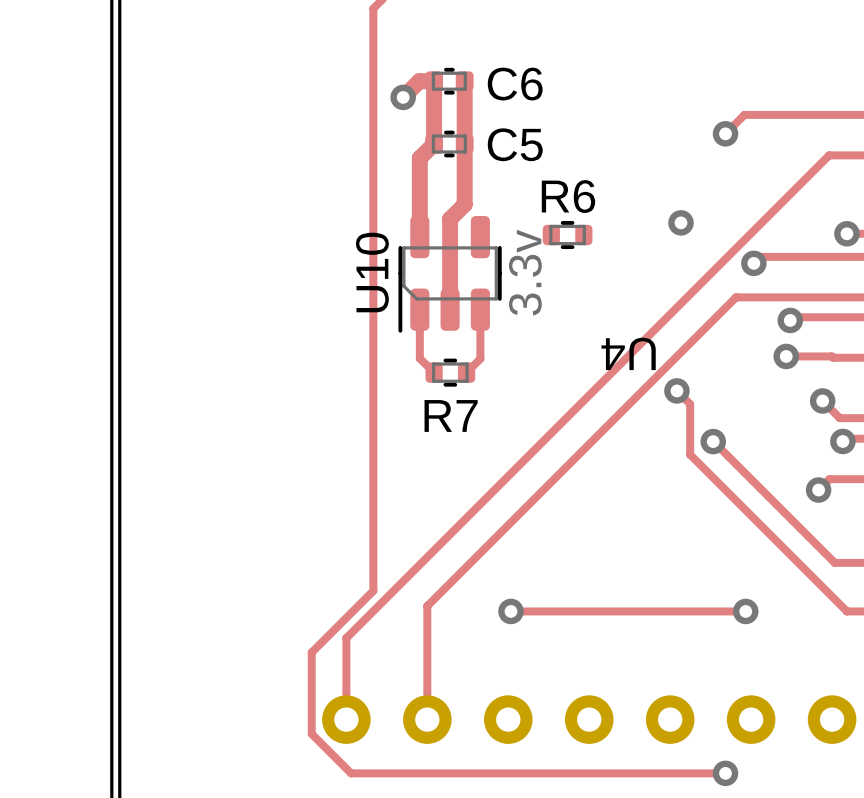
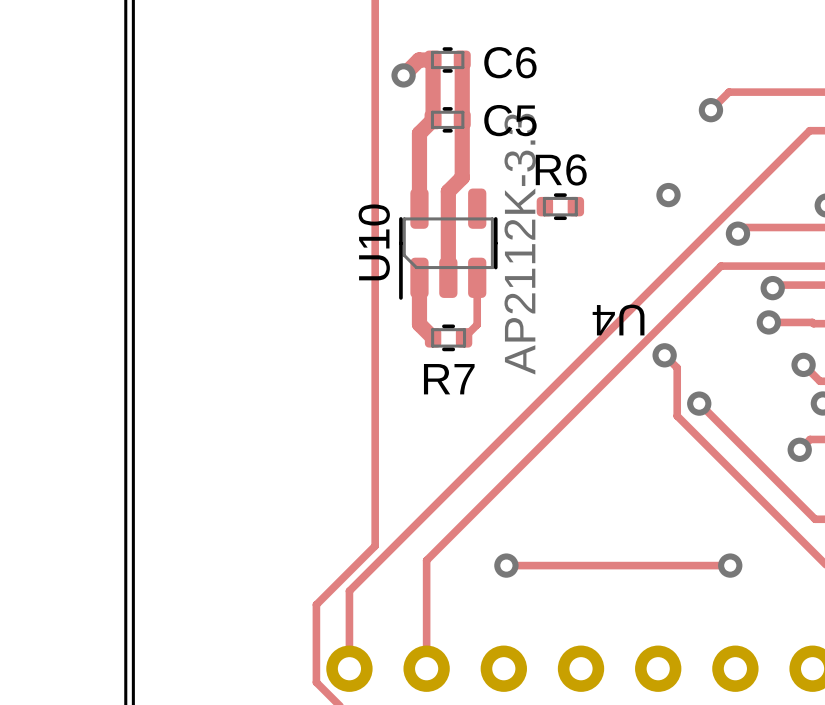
U10 value: 3.3v (525, 272) -> AP2112K-3.3 (520, 244)
track width: thin (419, 309) (419, 358) (434, 372) -> thick (419, 277) (419, 324) (433, 337)

